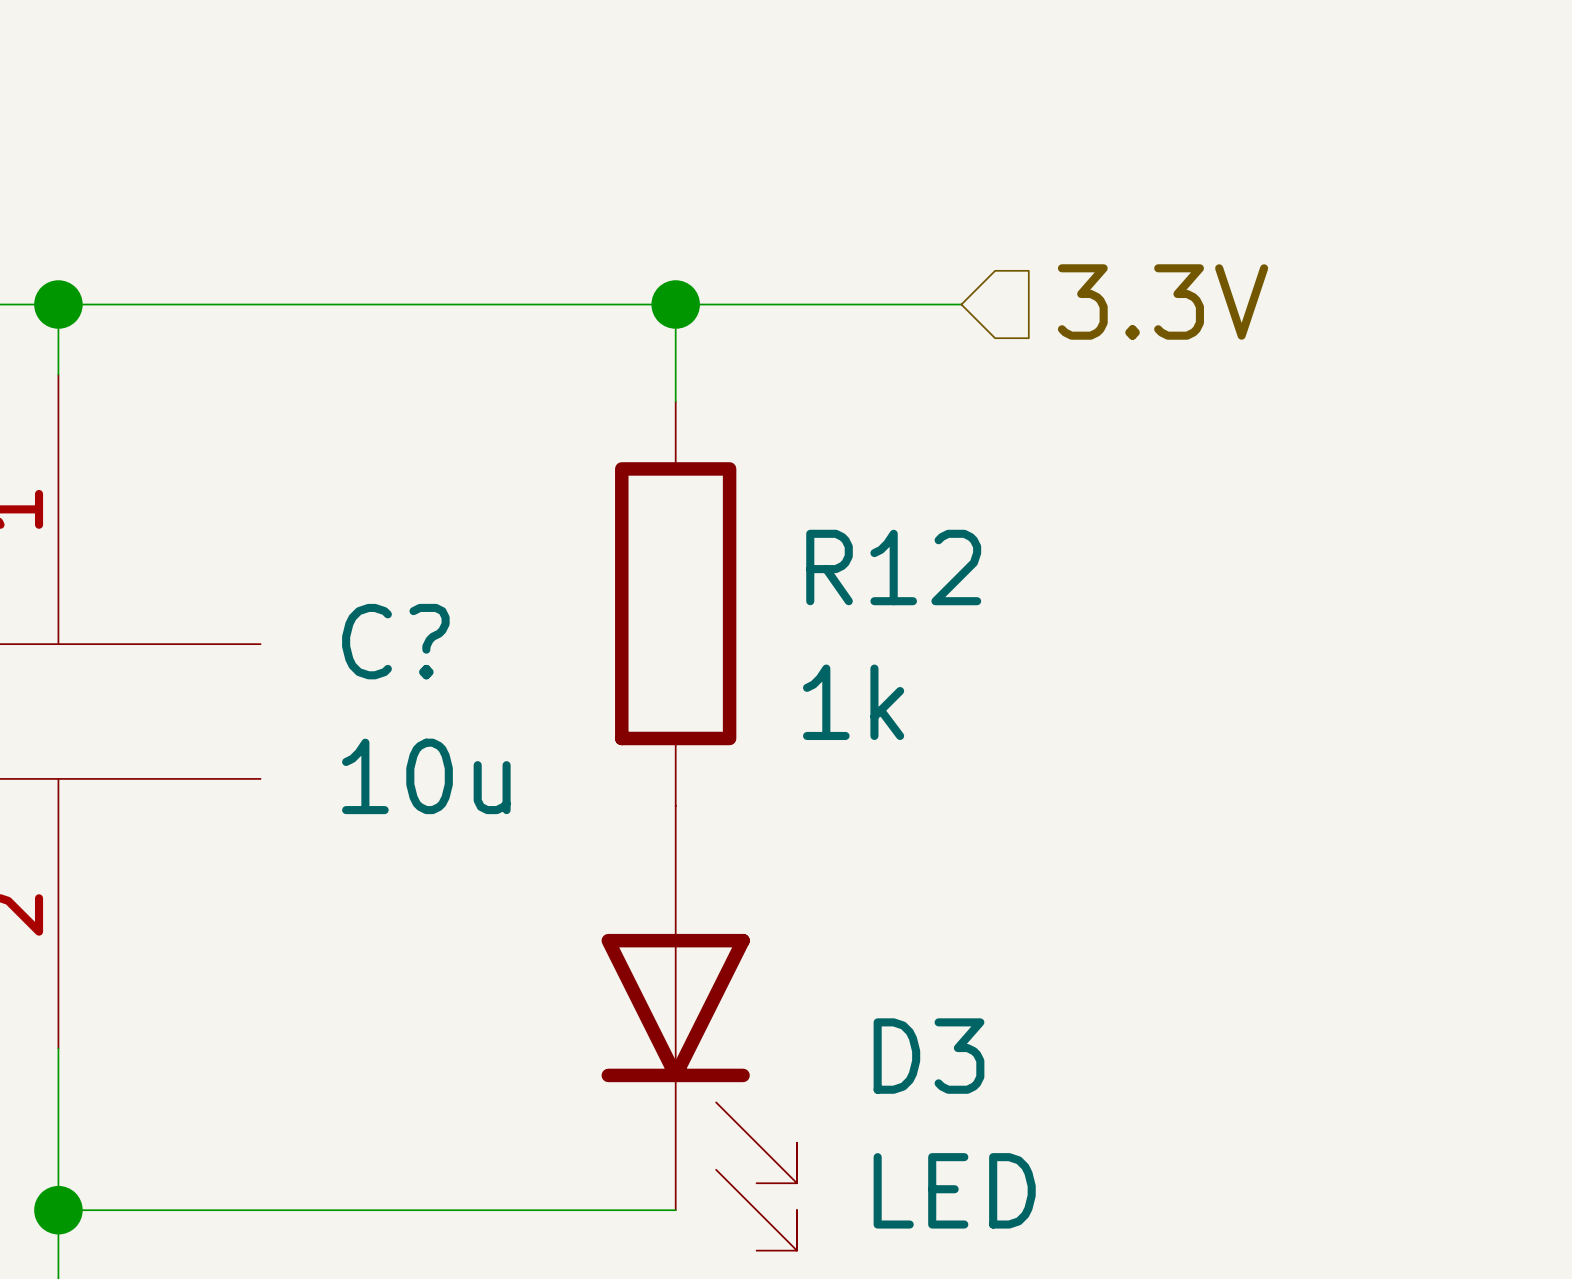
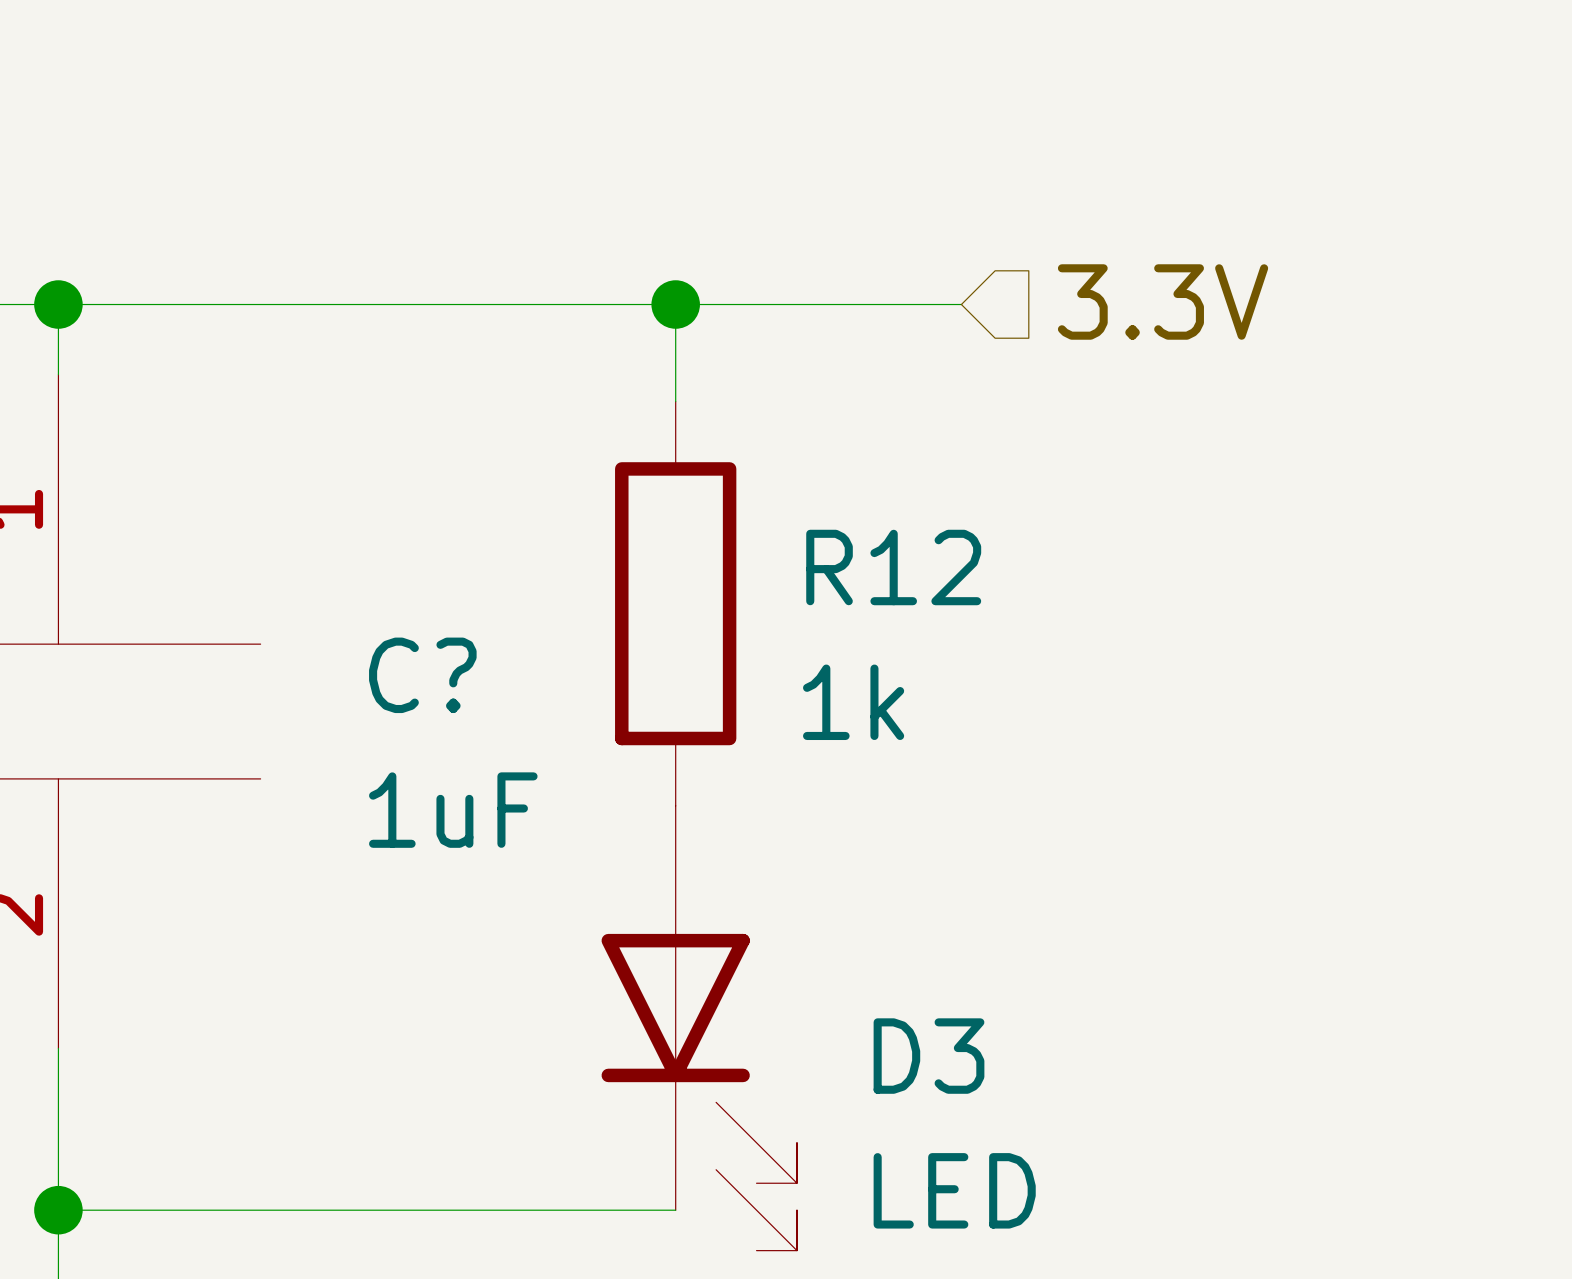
C? name position: C? (395, 641) -> C? (422, 675)
C? value: 10u (426, 776) -> 1uF (453, 810)

